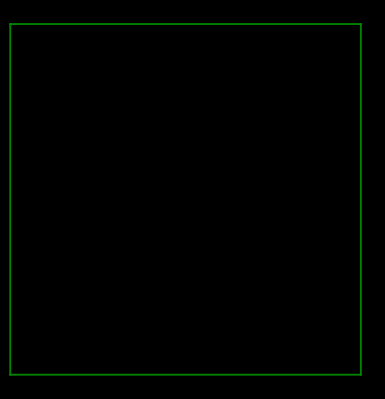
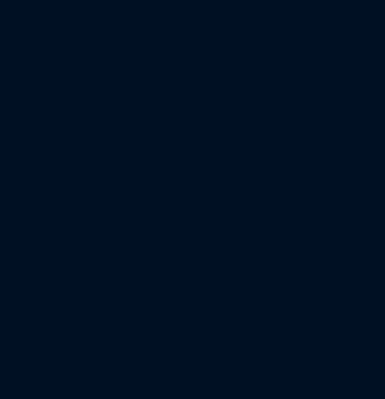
bottom track: (360, 24) (10, 24) (10, 374) (360, 374) (360, 24) -> none

